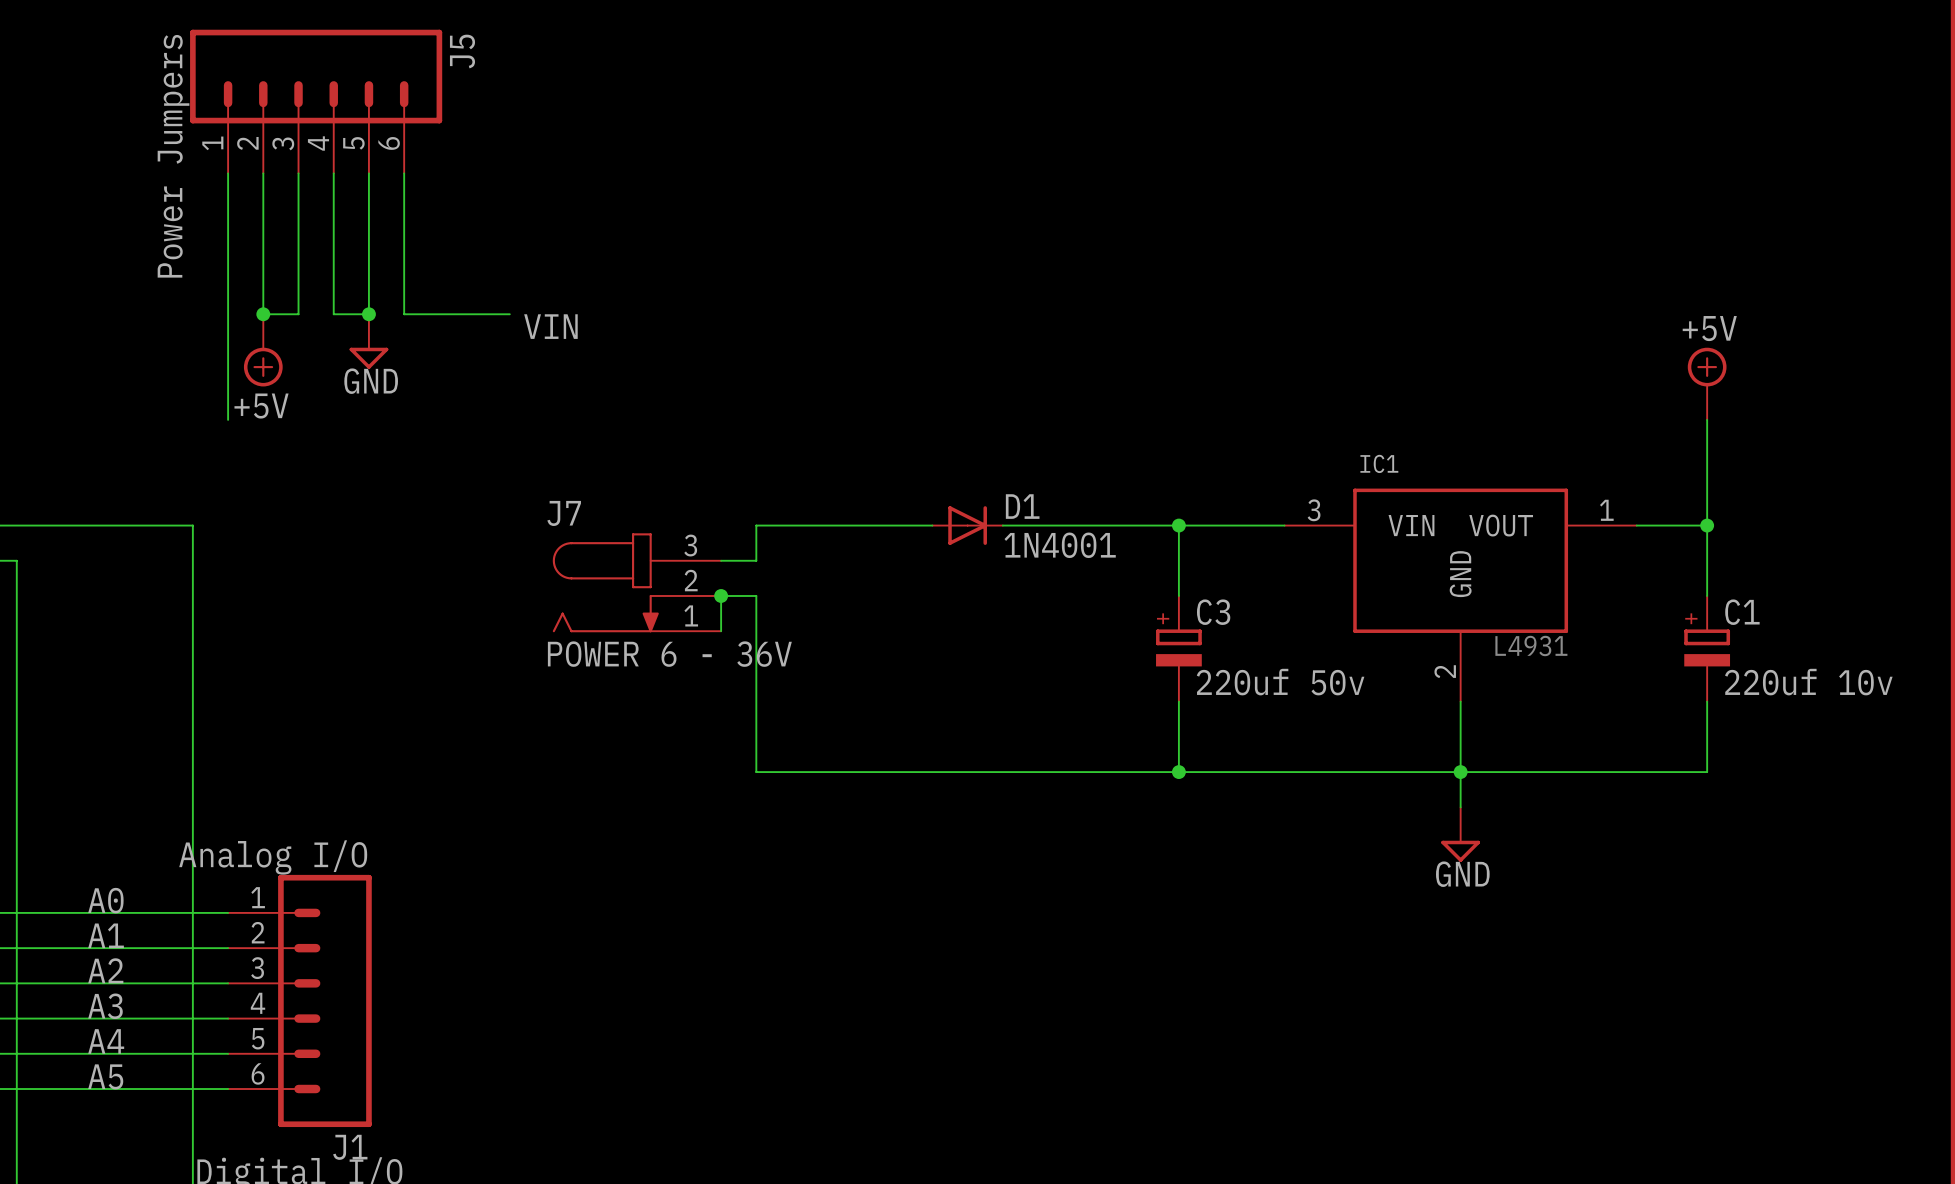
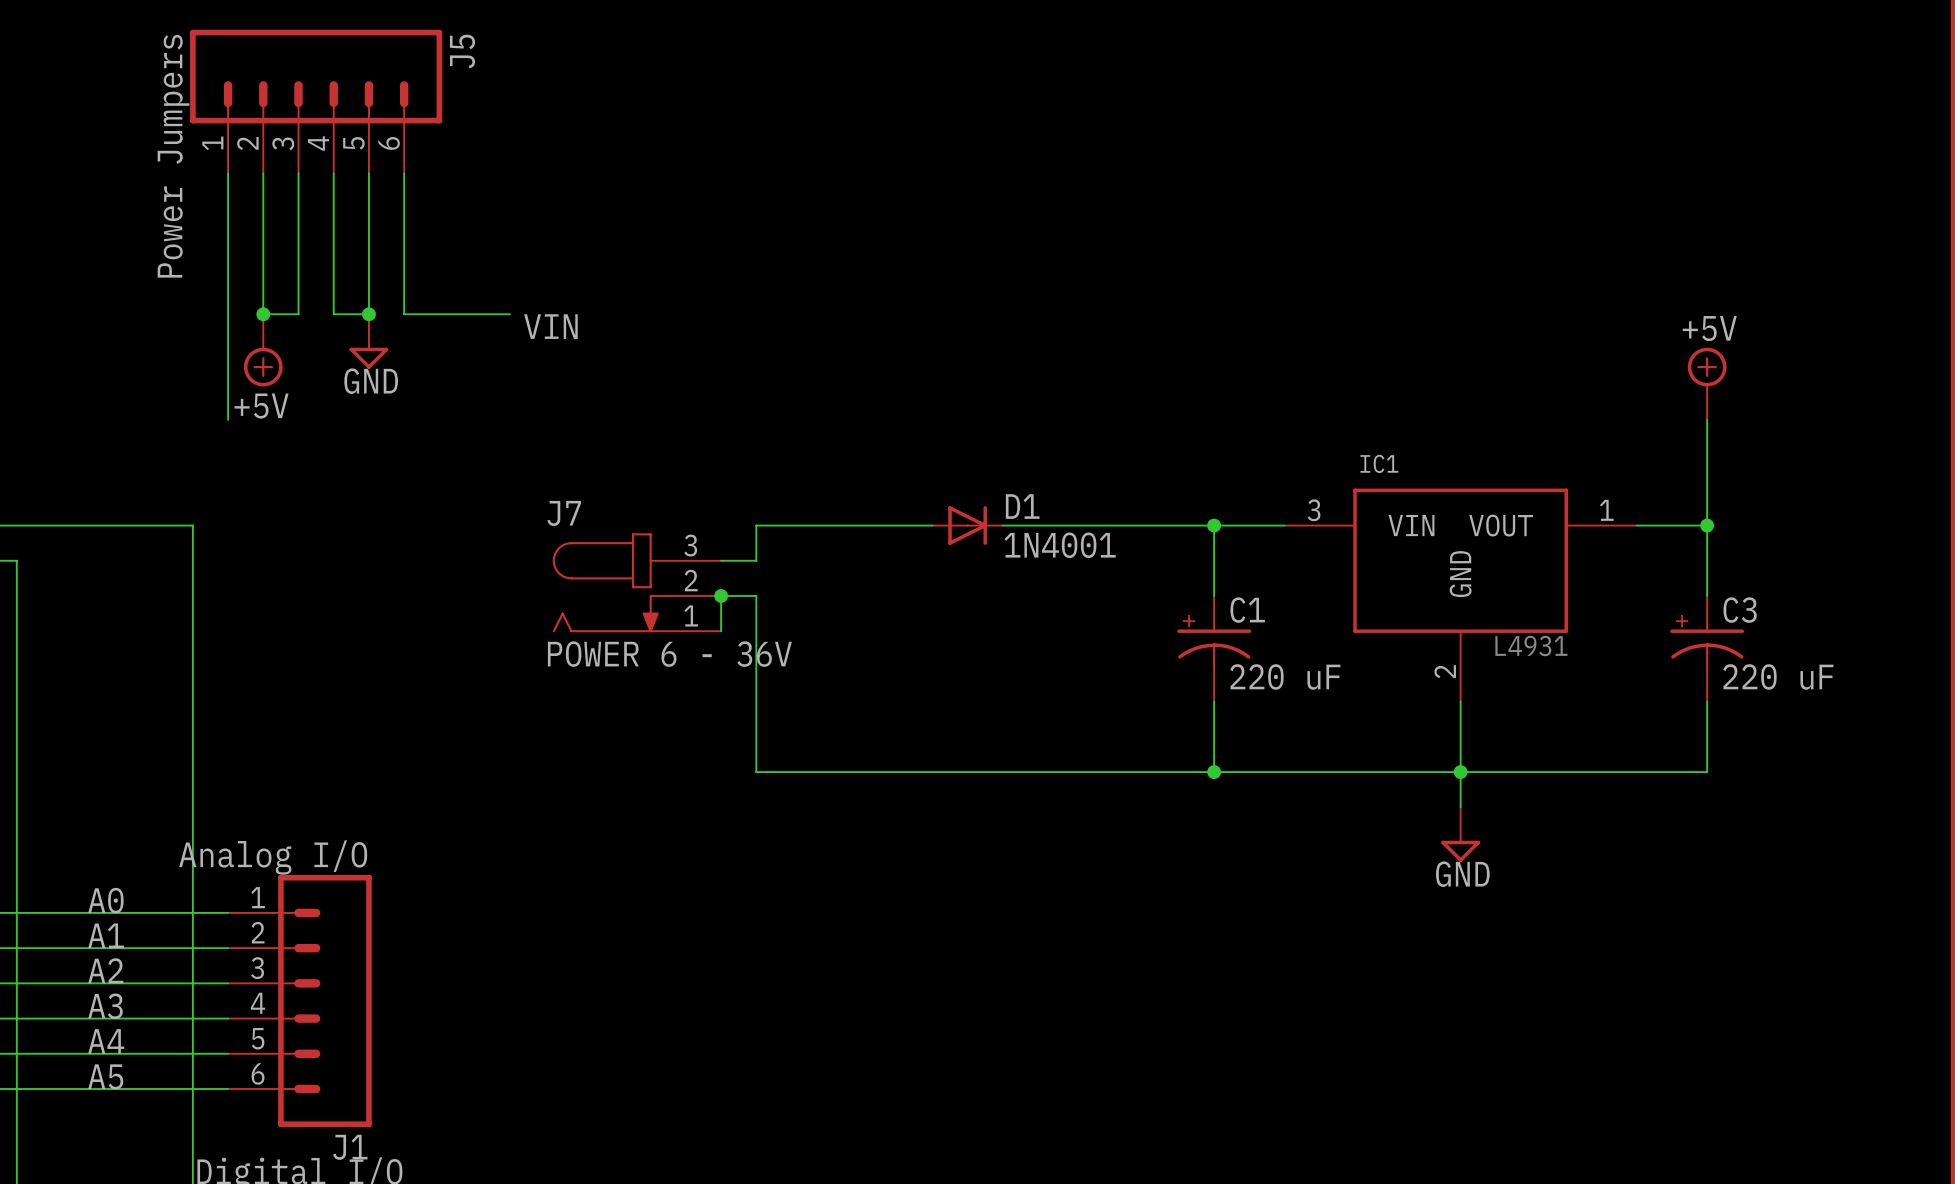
wire: (1178, 525) (1178, 595) -> (1214, 525) (1214, 595)
junction position: (1178, 525) -> (1214, 525)
C3 symbol: [1156, 595, 1202, 702] -> [1670, 595, 1745, 702]
C1 symbol: [1684, 595, 1731, 702] -> [1177, 595, 1252, 702]
C3 value: 220uf 50v (1280, 682) -> 220 uF (1778, 676)
C1 value: 220uf 10v (1808, 682) -> 220 uF (1285, 676)
wire: (1178, 701) (1178, 772) -> (1214, 701) (1214, 772)
junction position: (1178, 772) -> (1214, 772)

